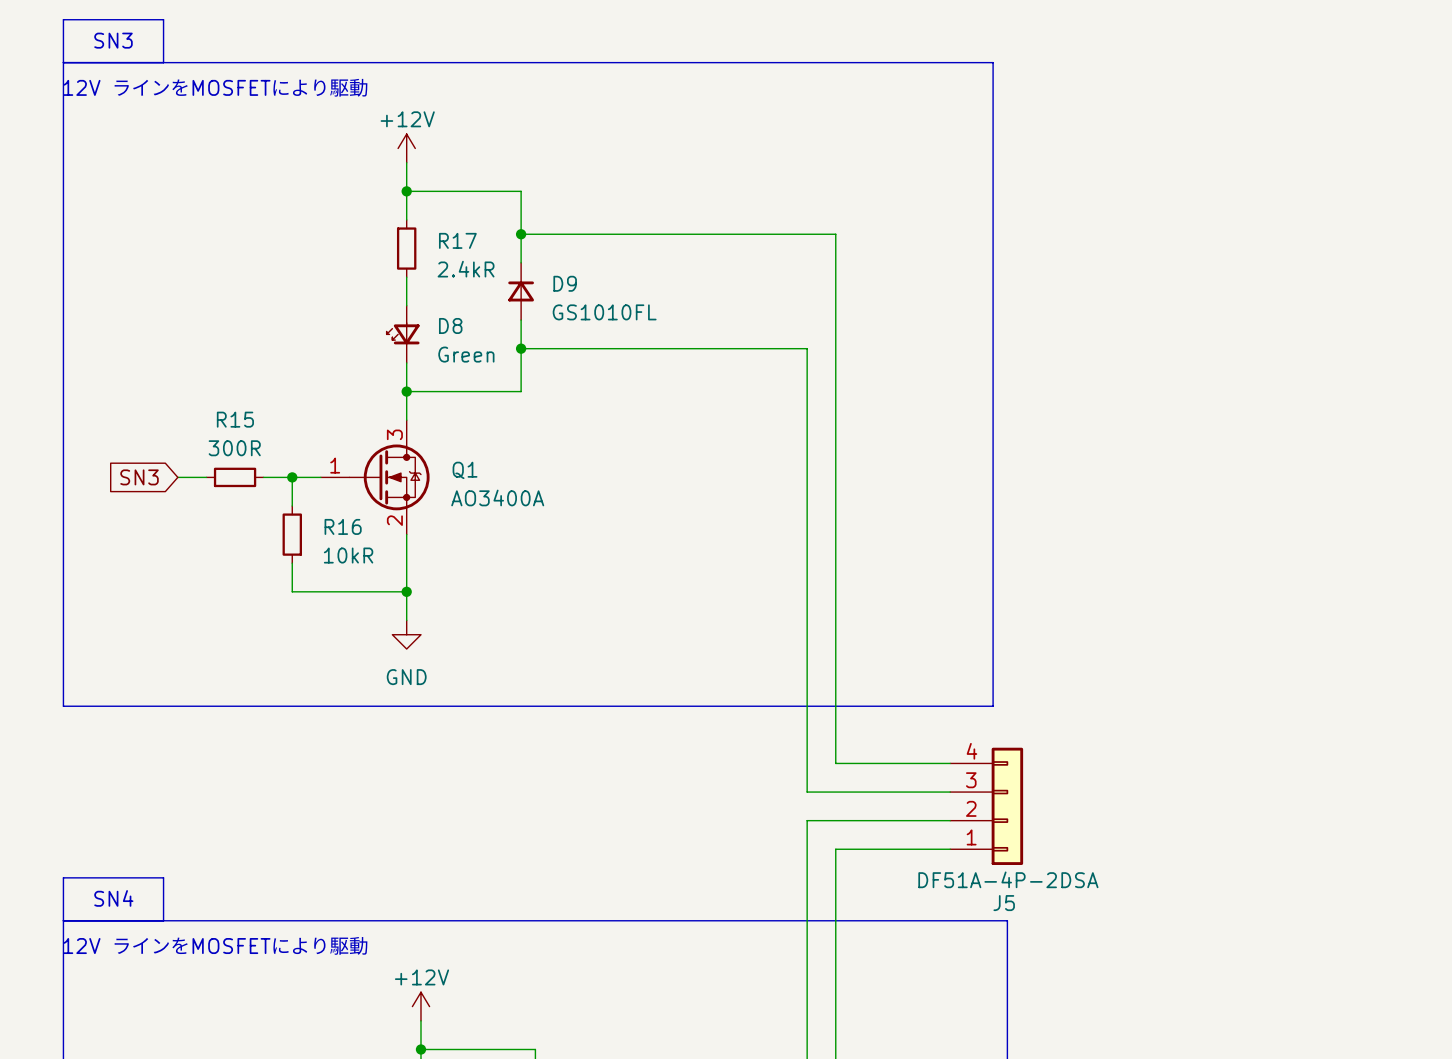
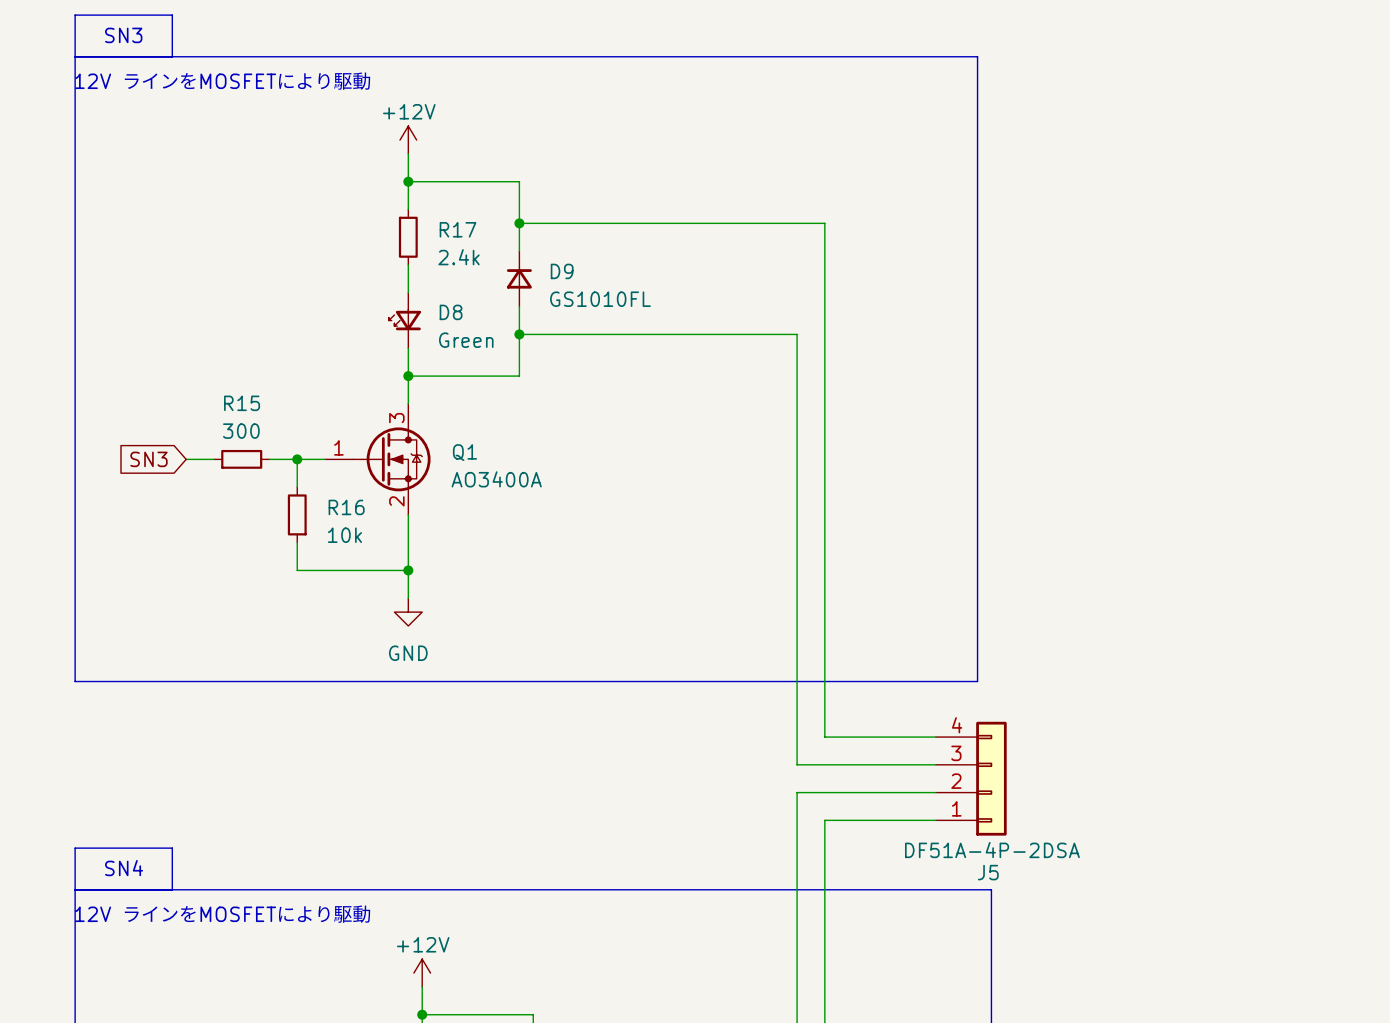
R17 value: 2.4kR (466, 269) -> 2.4k (459, 257)
R15 value: 300R (234, 448) -> 300 (241, 431)
R16 value: 10kR (348, 555) -> 10k (344, 535)

